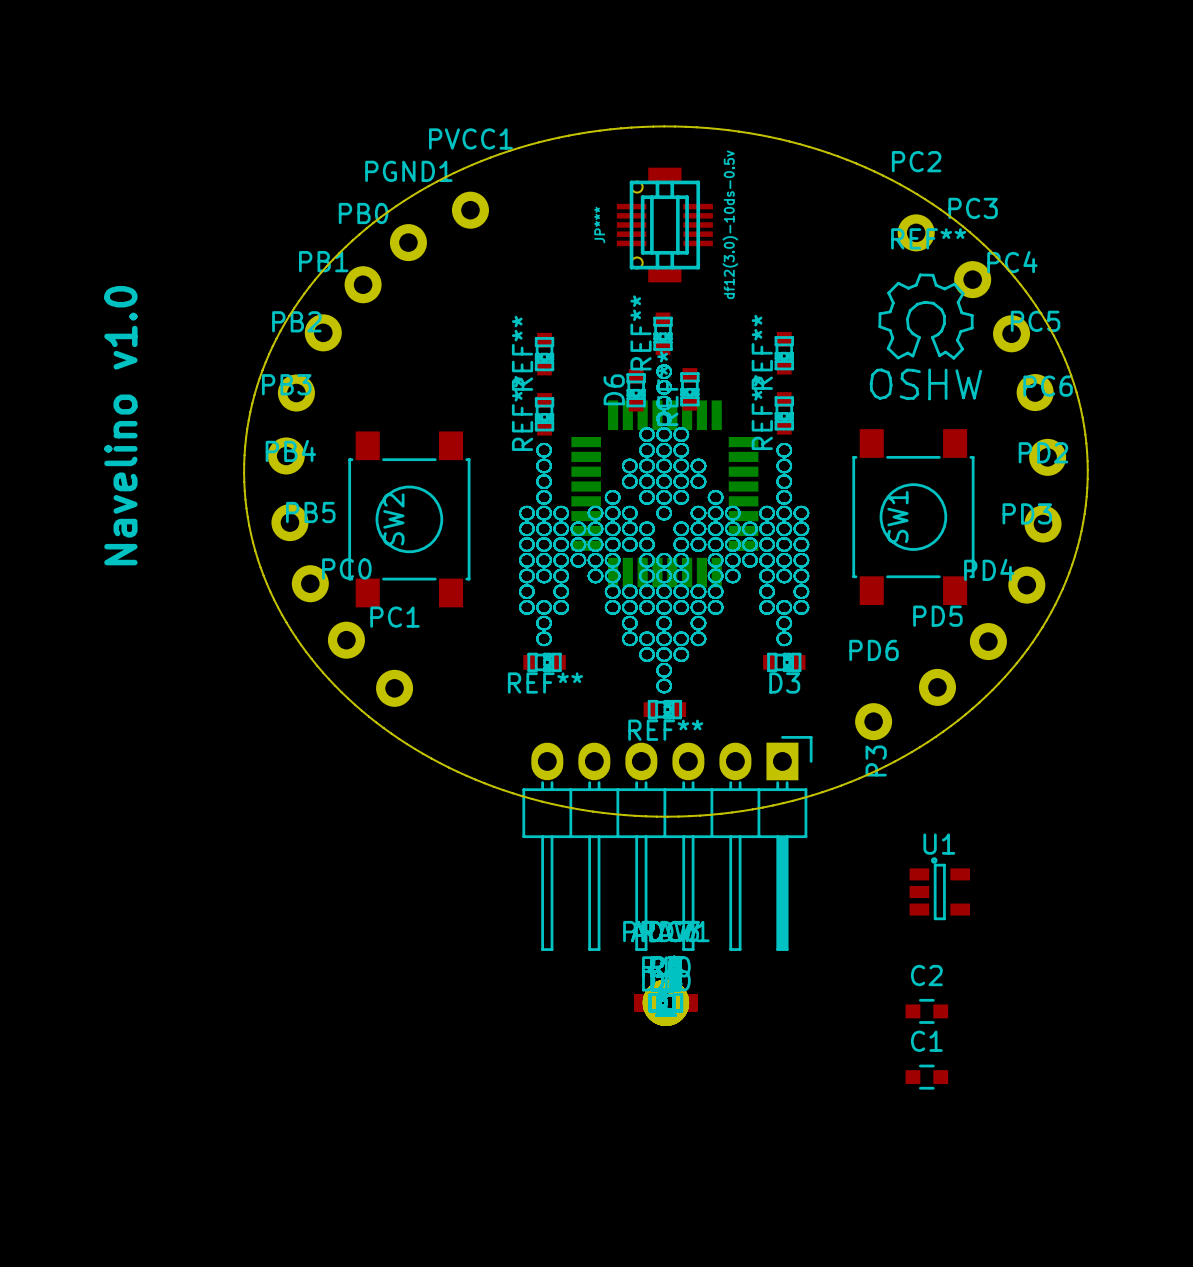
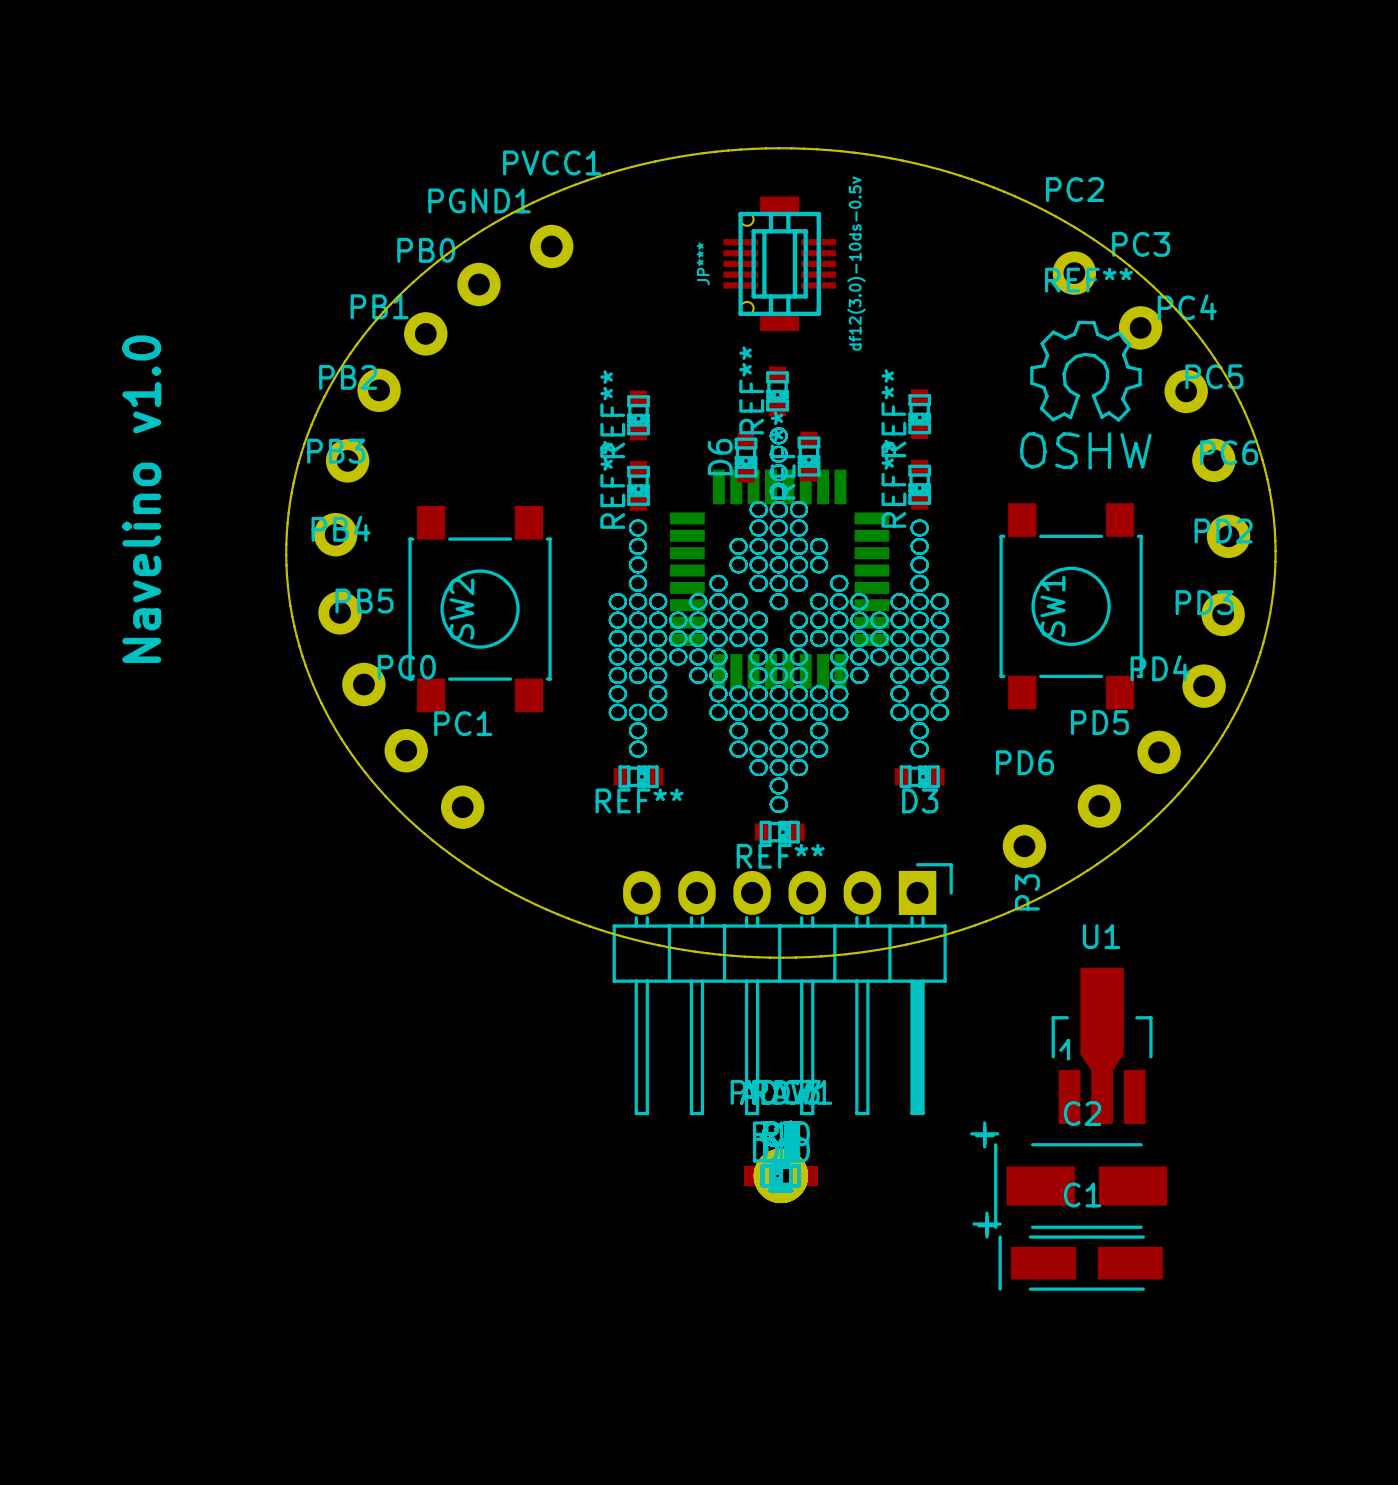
U1 name position: U1 (939, 844) -> U1 (1101, 936)
U1 footprint: [909, 857, 970, 921] -> [1051, 967, 1153, 1125]
C2 footprint: [905, 998, 949, 1024] -> [970, 1121, 1168, 1229]
C1 footprint: [905, 1064, 949, 1090] -> [972, 1211, 1163, 1291]

